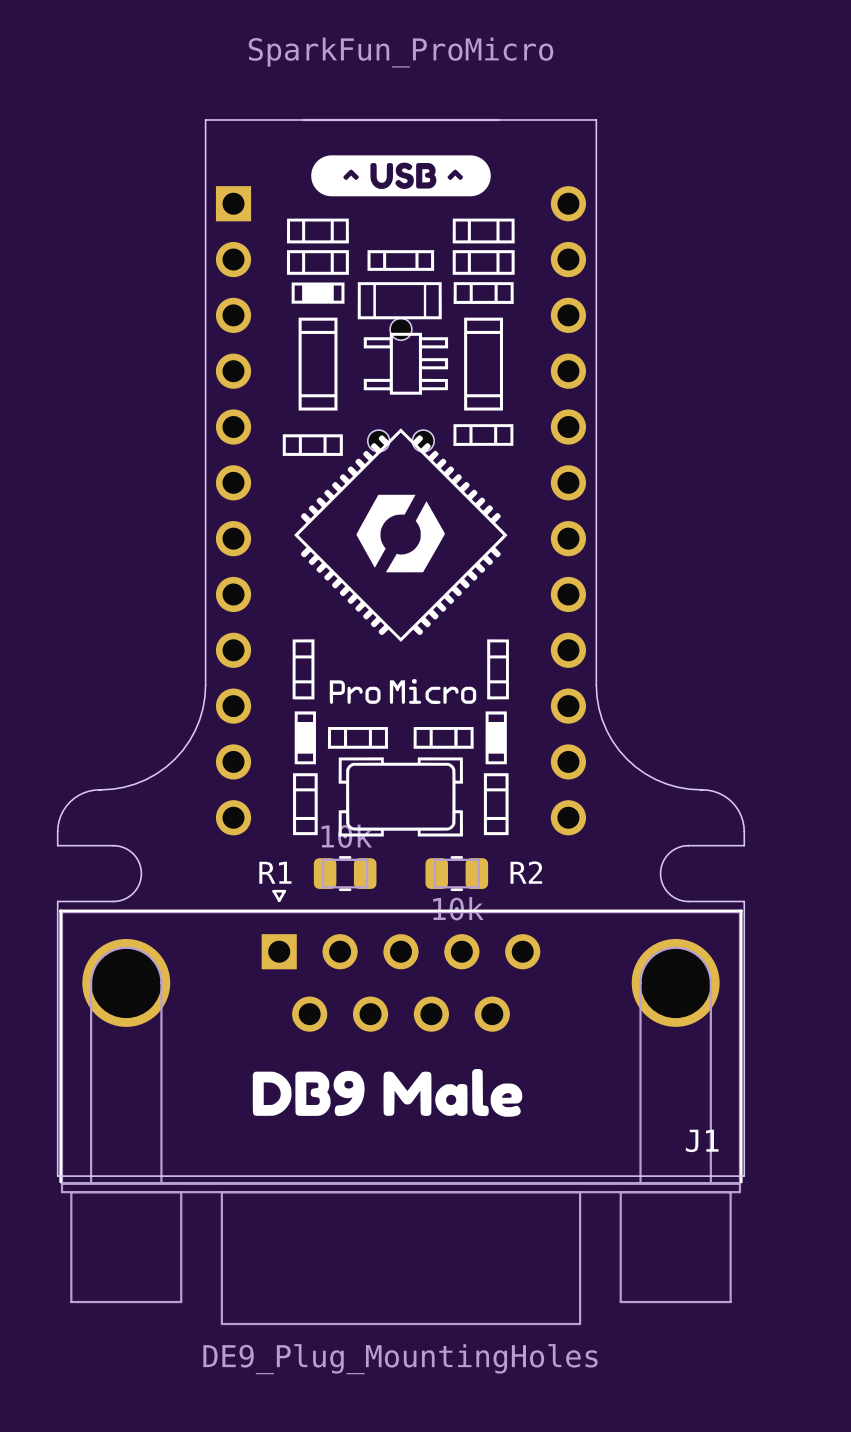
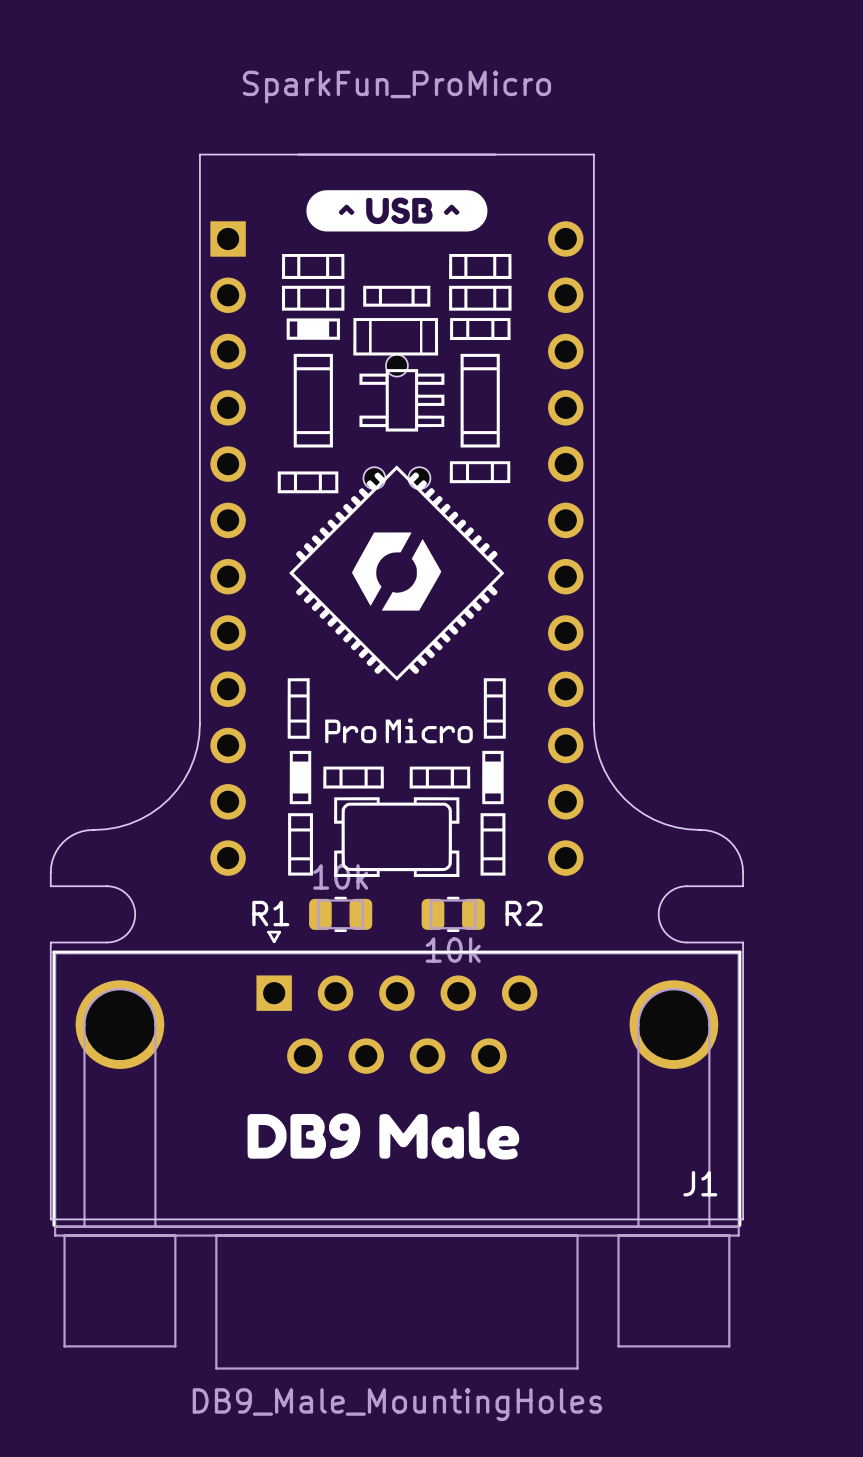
J1 value: DE9_Plug_MountingHoles (400, 1359) -> DB9_Male_MountingHoles (397, 1404)

